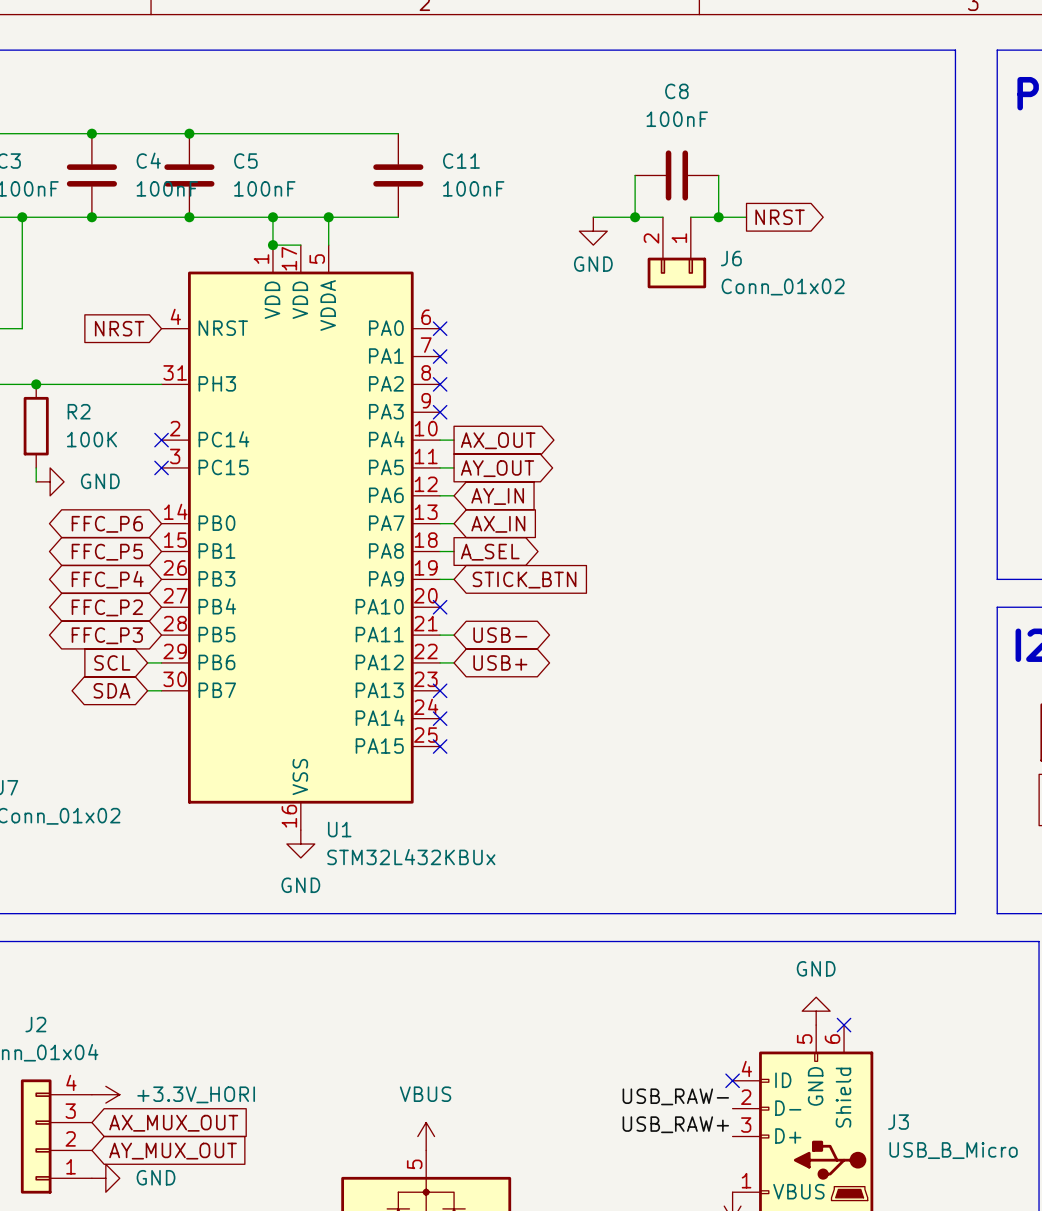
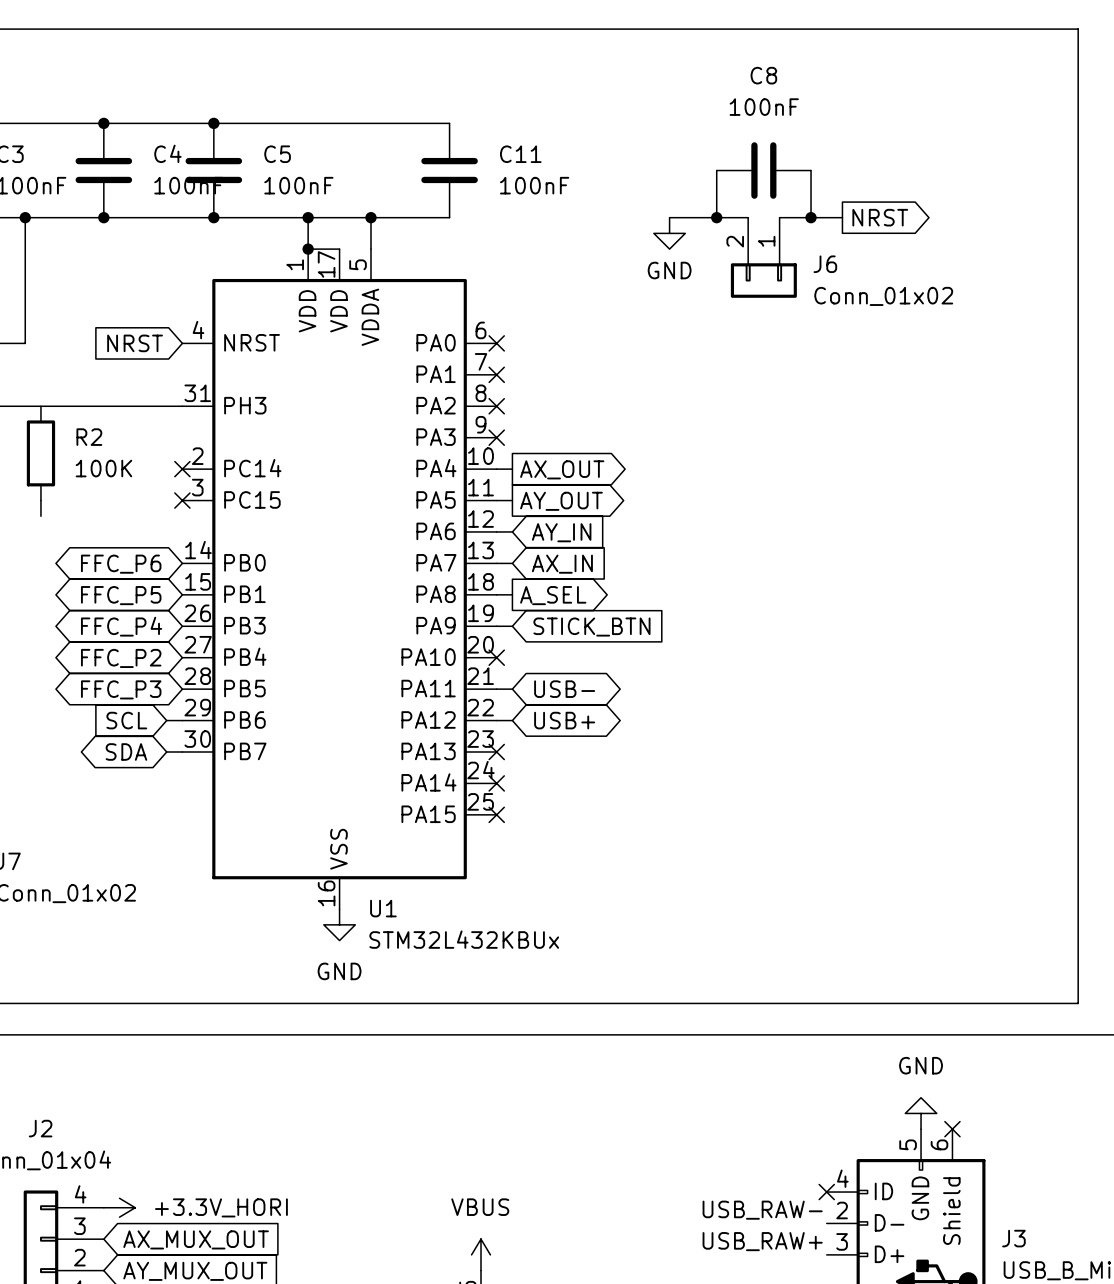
junction: (36, 384) -> none
power symbol: GND (50, 481) -> none

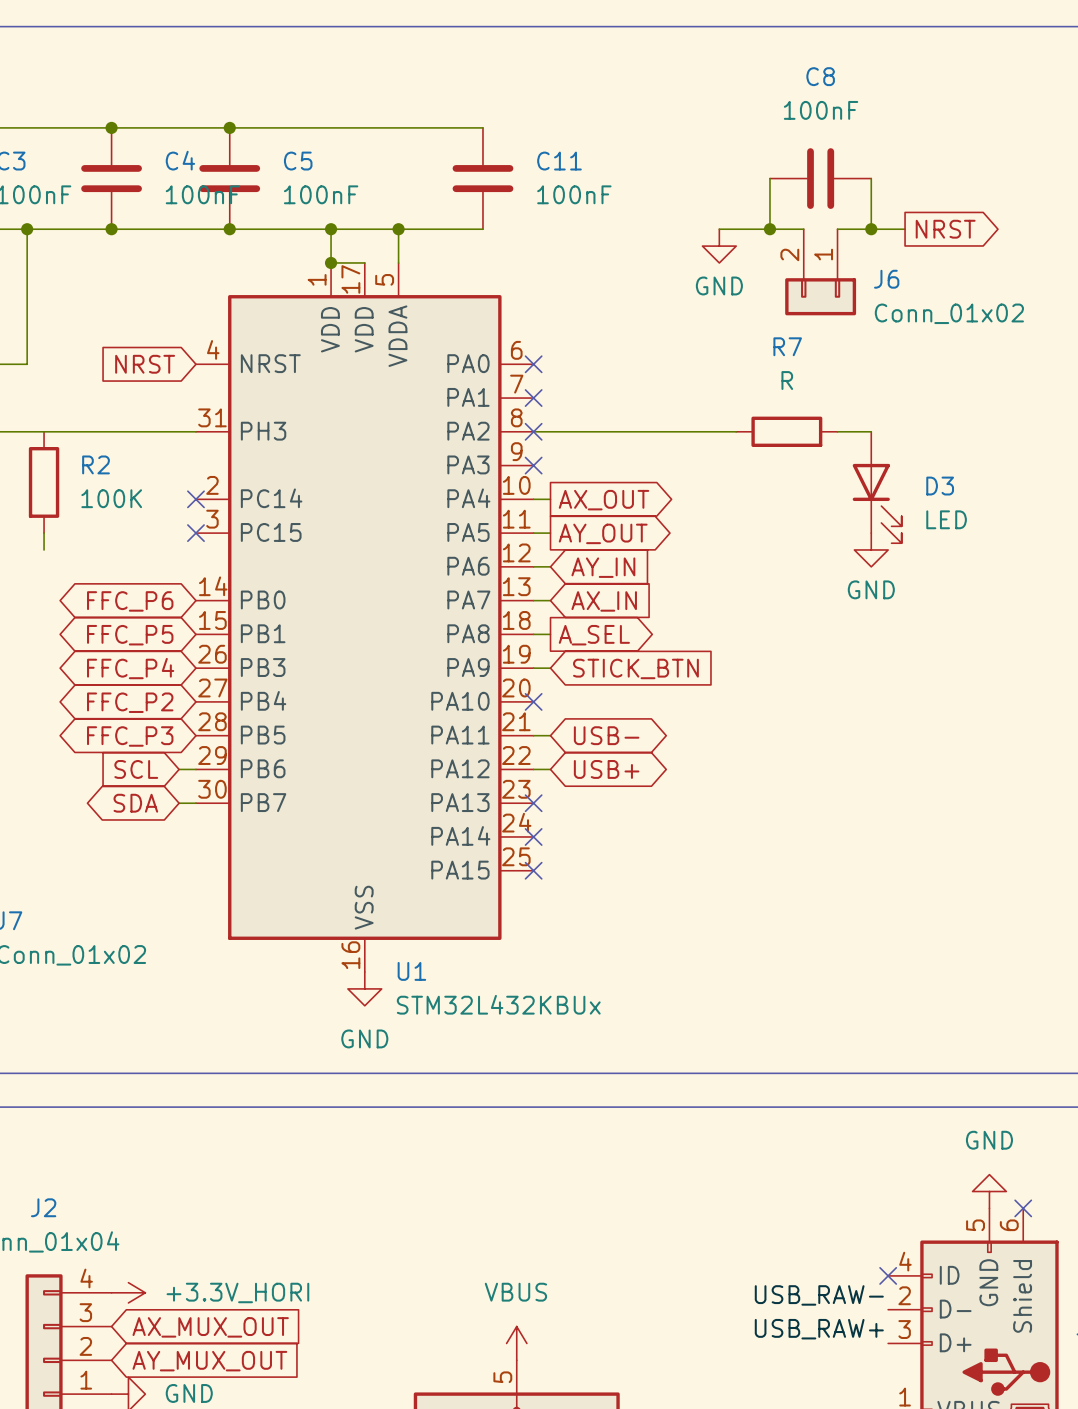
wire: none -> (533, 431) (736, 431)
R7: none -> R (786, 431)
wire: none -> (837, 431) (871, 431)
D3: none -> LED (877, 487)
power symbol: none -> GND (871, 549)

